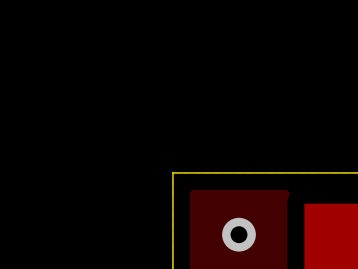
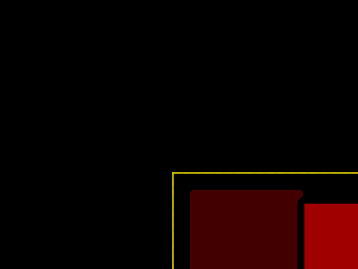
via: (238, 234) -> none

